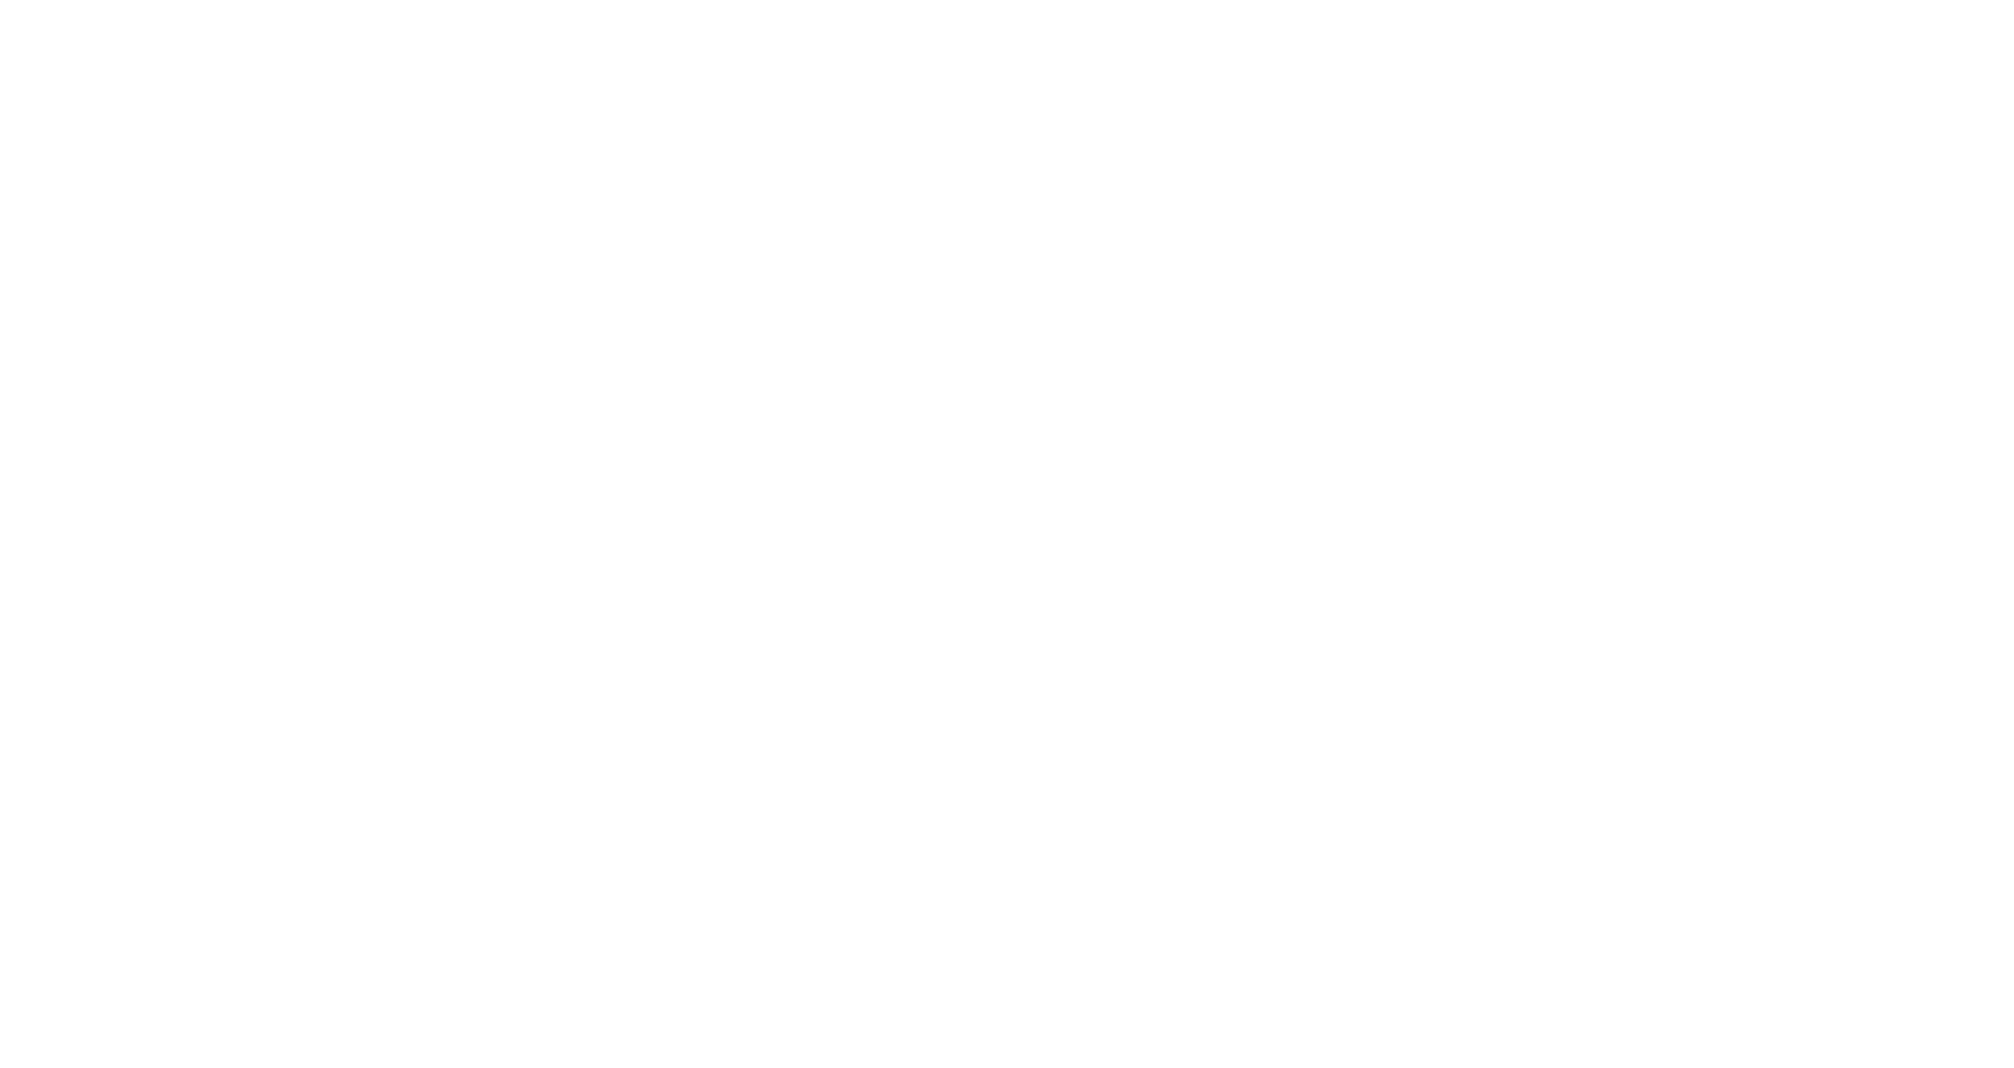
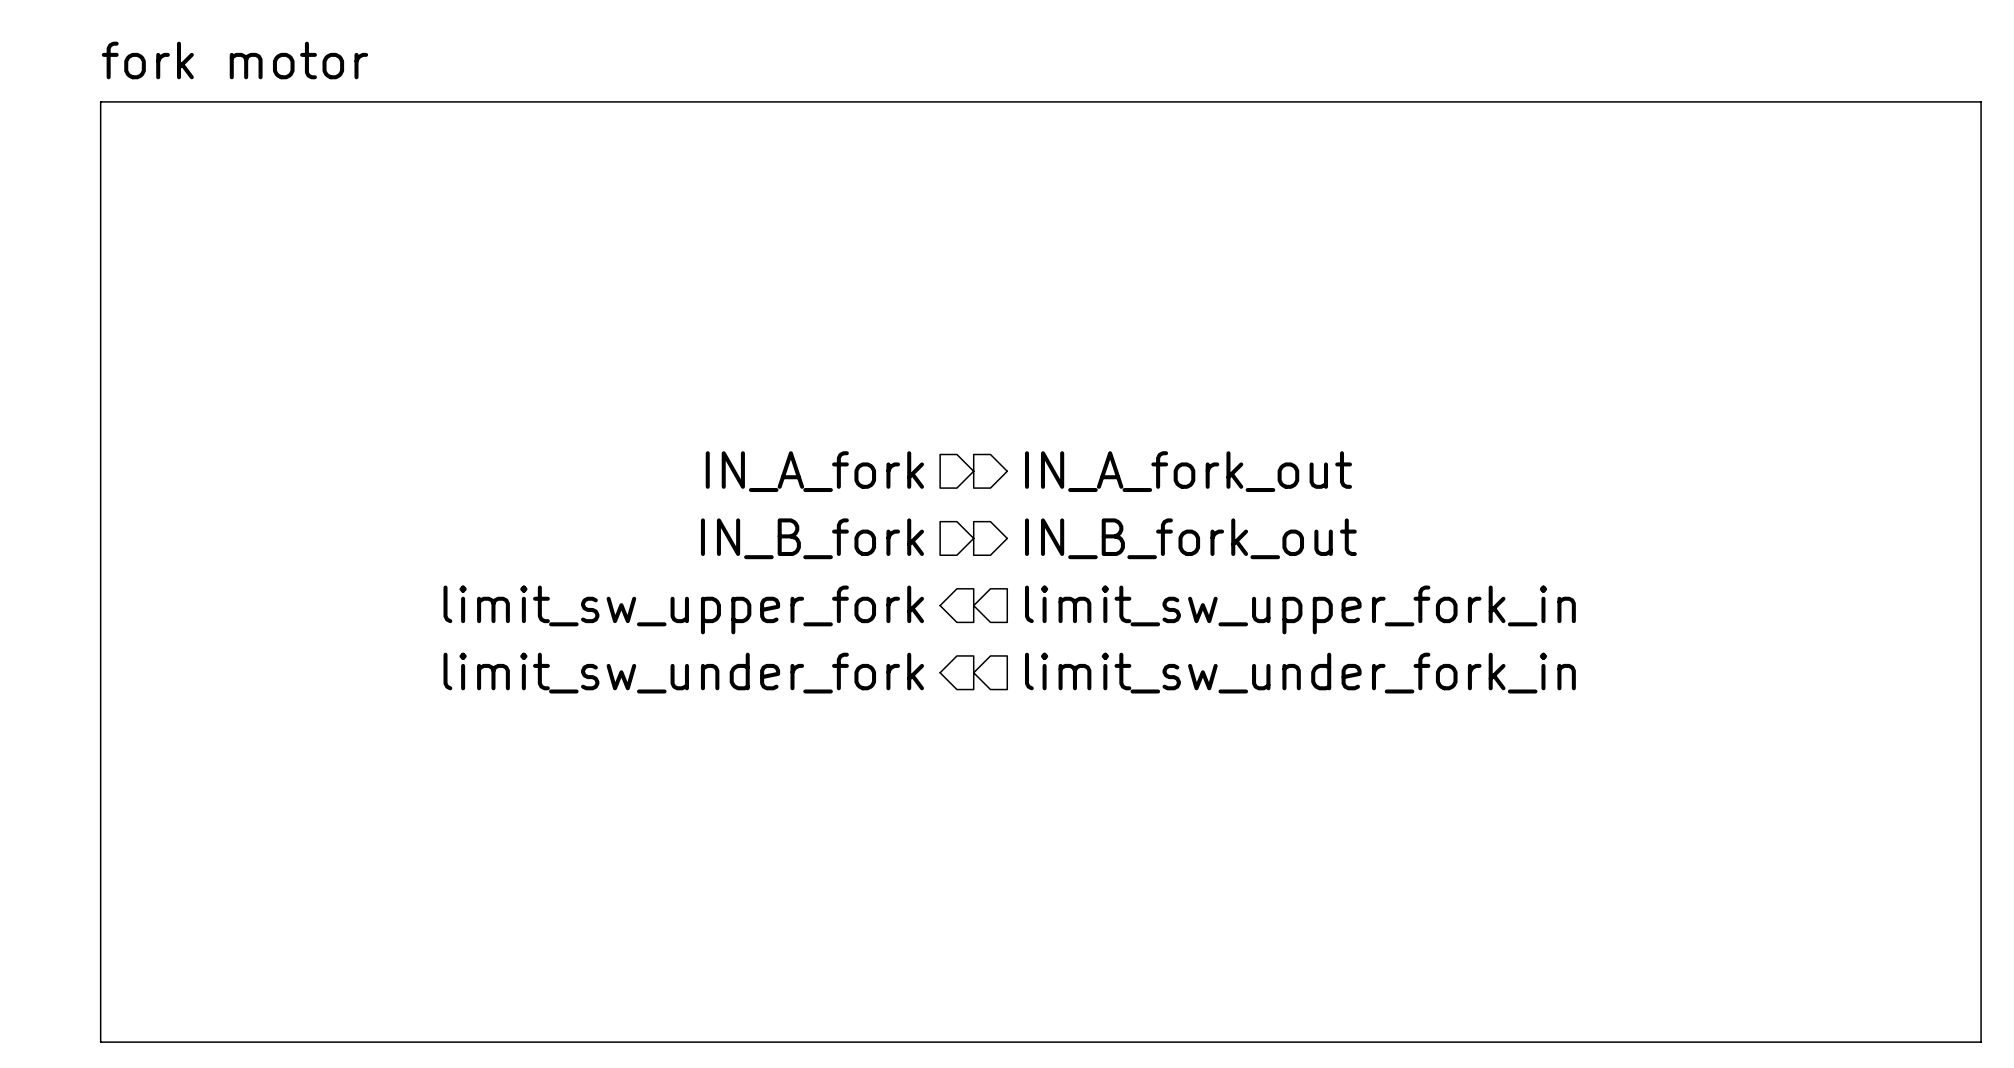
text: none -> fork motor (234, 60)
line: none -> (100, 101) (1981, 101) (1981, 1042) (100, 1042) (100, 101)
hierarchical label: none -> IN_A_fork (814, 471)
hierarchical label: none -> IN_A_fork_out (1188, 471)
hierarchical label: none -> IN_B_fork (812, 538)
hierarchical label: none -> IN_B_fork_out (1190, 538)
hierarchical label: none -> limit_sw_upper_fork (683, 609)
hierarchical label: none -> limit_sw_upper_fork_in (1300, 609)
hierarchical label: none -> limit_sw_under_fork (683, 673)
hierarchical label: none -> limit_sw_under_fork_in (1300, 673)

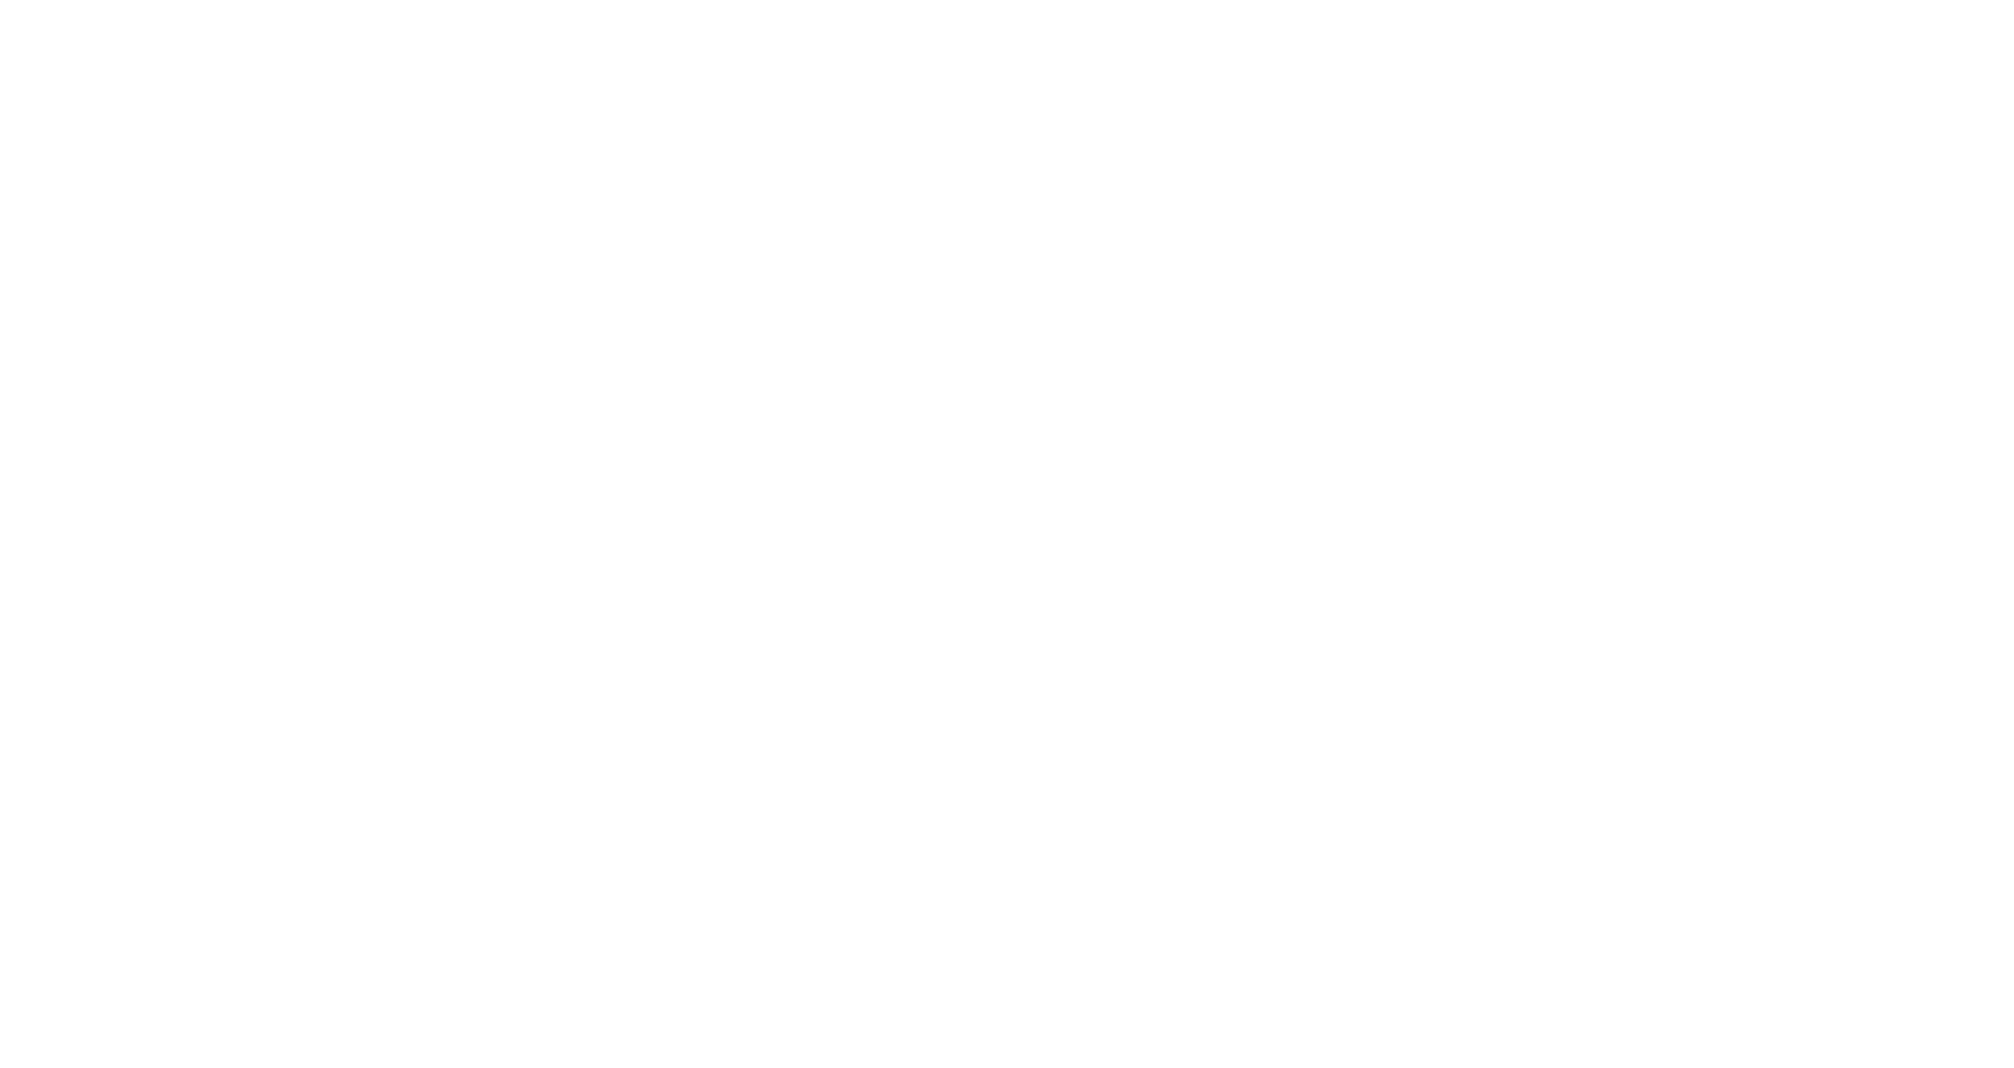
text: fork motor (234, 60) -> none
line: (100, 101) (1981, 101) (1981, 1042) (100, 1042) (100, 101) -> none
hierarchical label: IN_A_fork (814, 471) -> none
hierarchical label: IN_A_fork_out (1188, 471) -> none
hierarchical label: IN_B_fork (812, 538) -> none
hierarchical label: IN_B_fork_out (1190, 538) -> none
hierarchical label: limit_sw_upper_fork (683, 609) -> none
hierarchical label: limit_sw_upper_fork_in (1300, 609) -> none
hierarchical label: limit_sw_under_fork (683, 673) -> none
hierarchical label: limit_sw_under_fork_in (1300, 673) -> none

